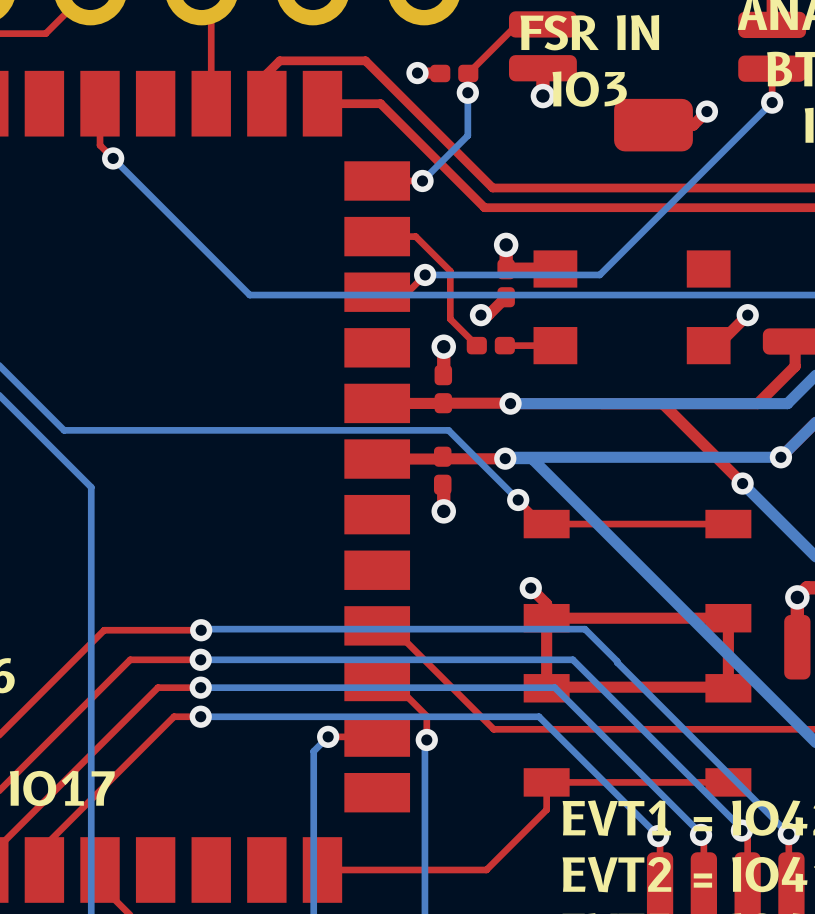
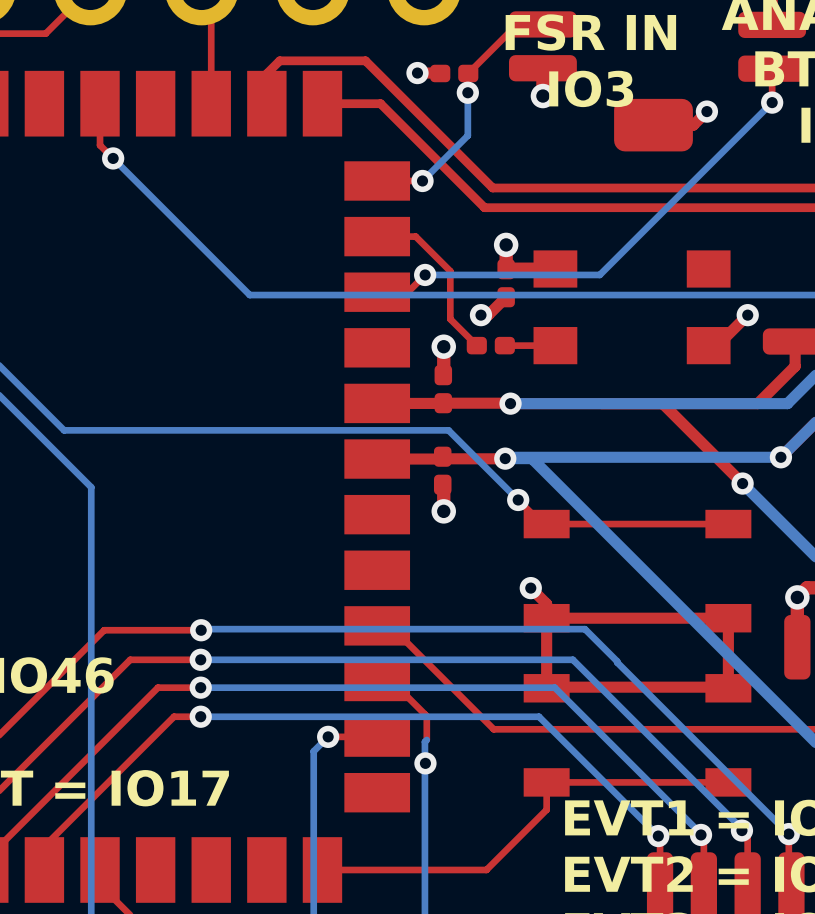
via position: (426, 739) -> (425, 763)

